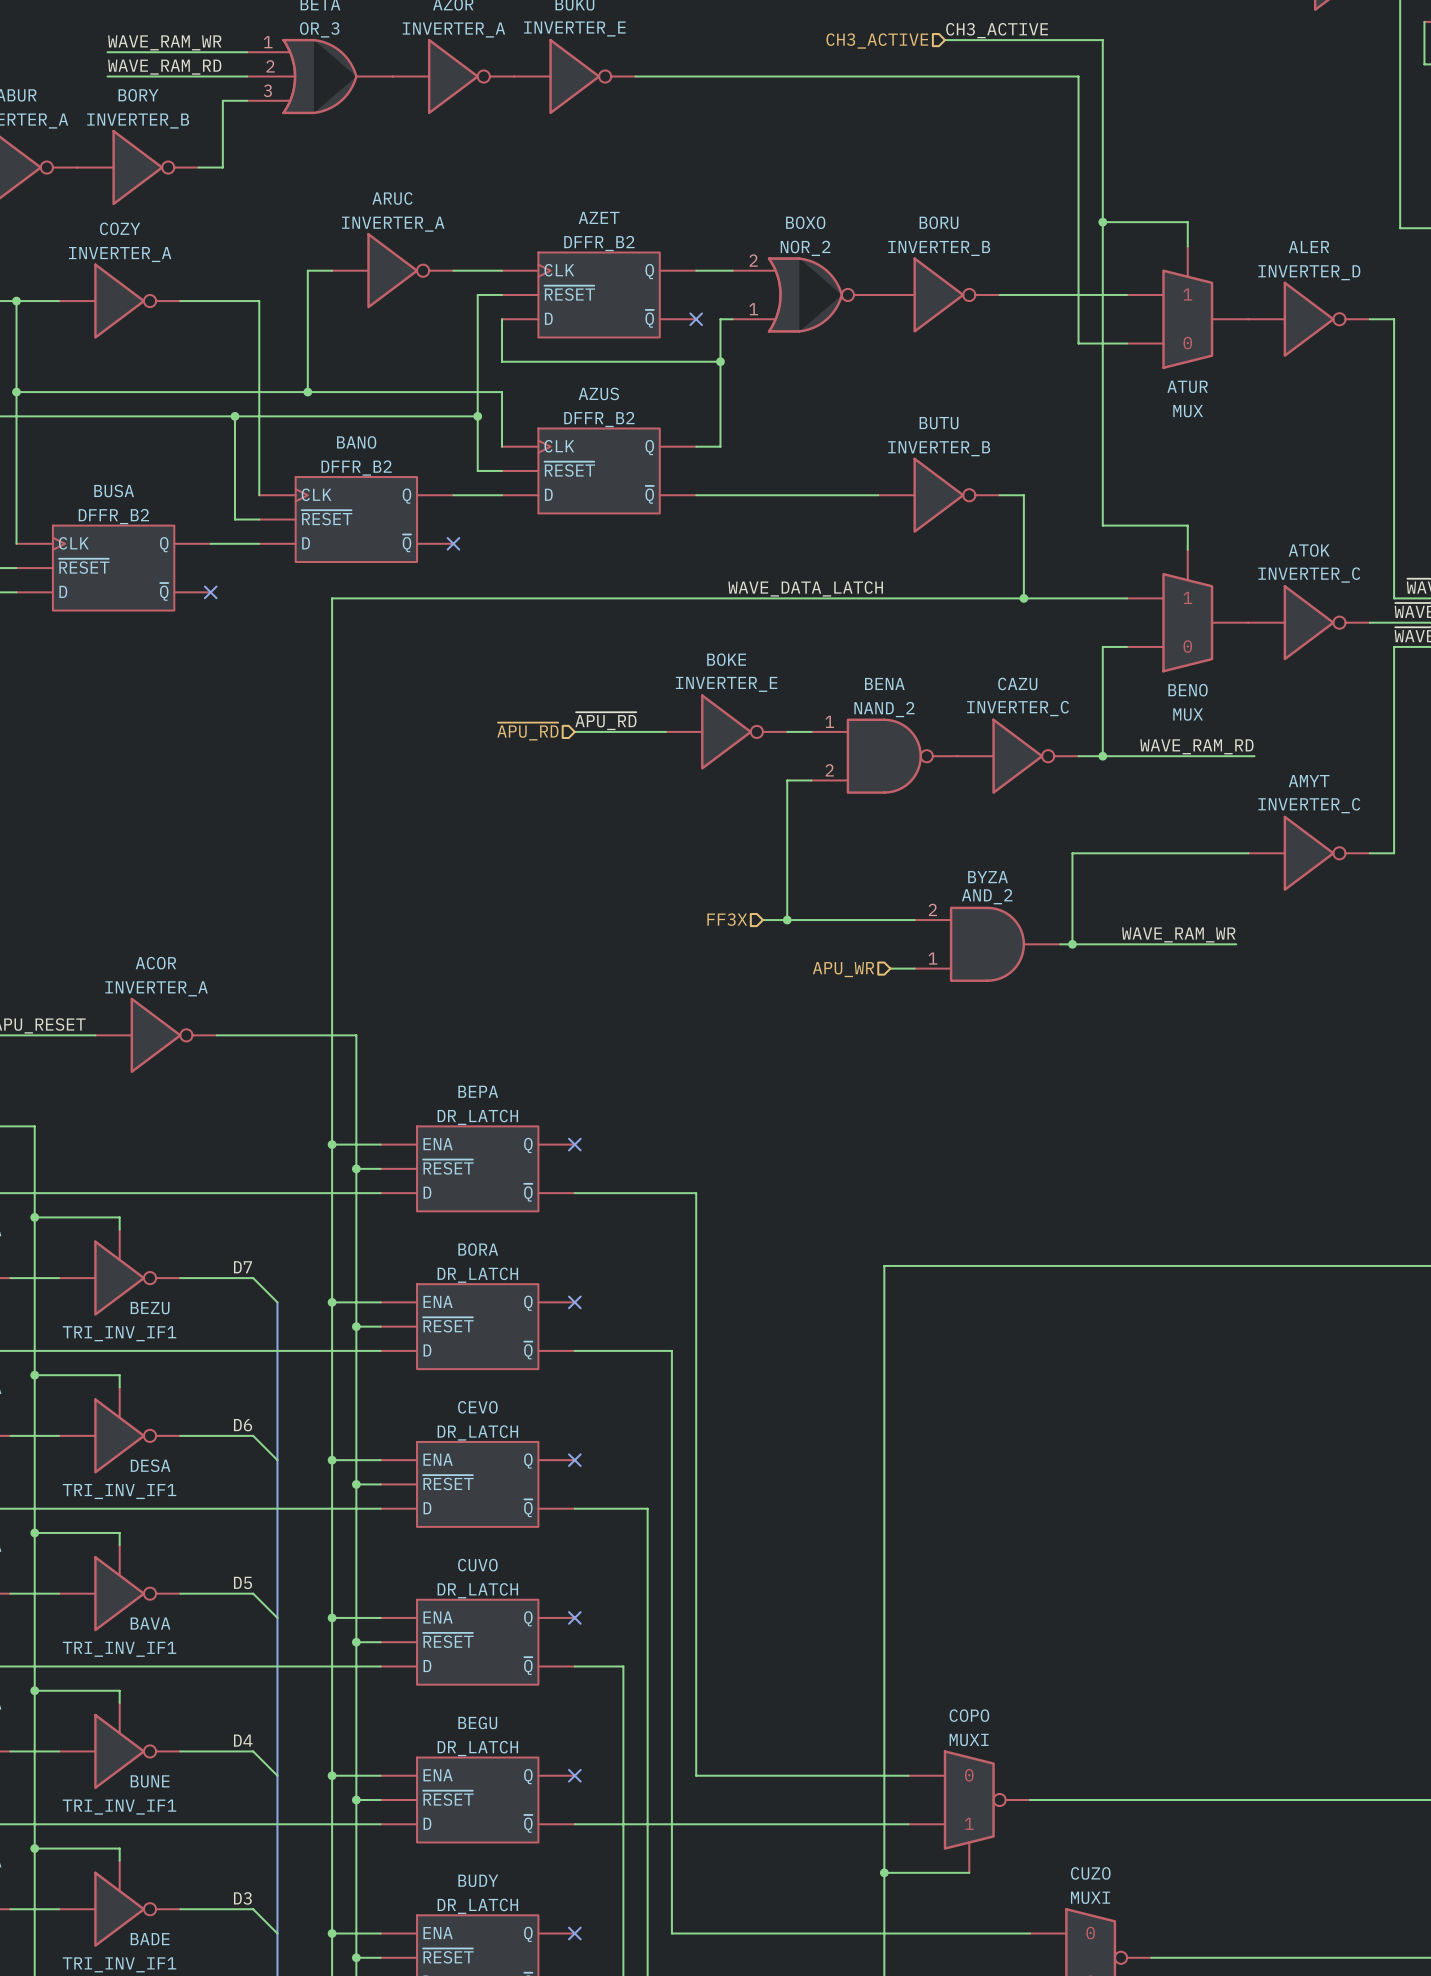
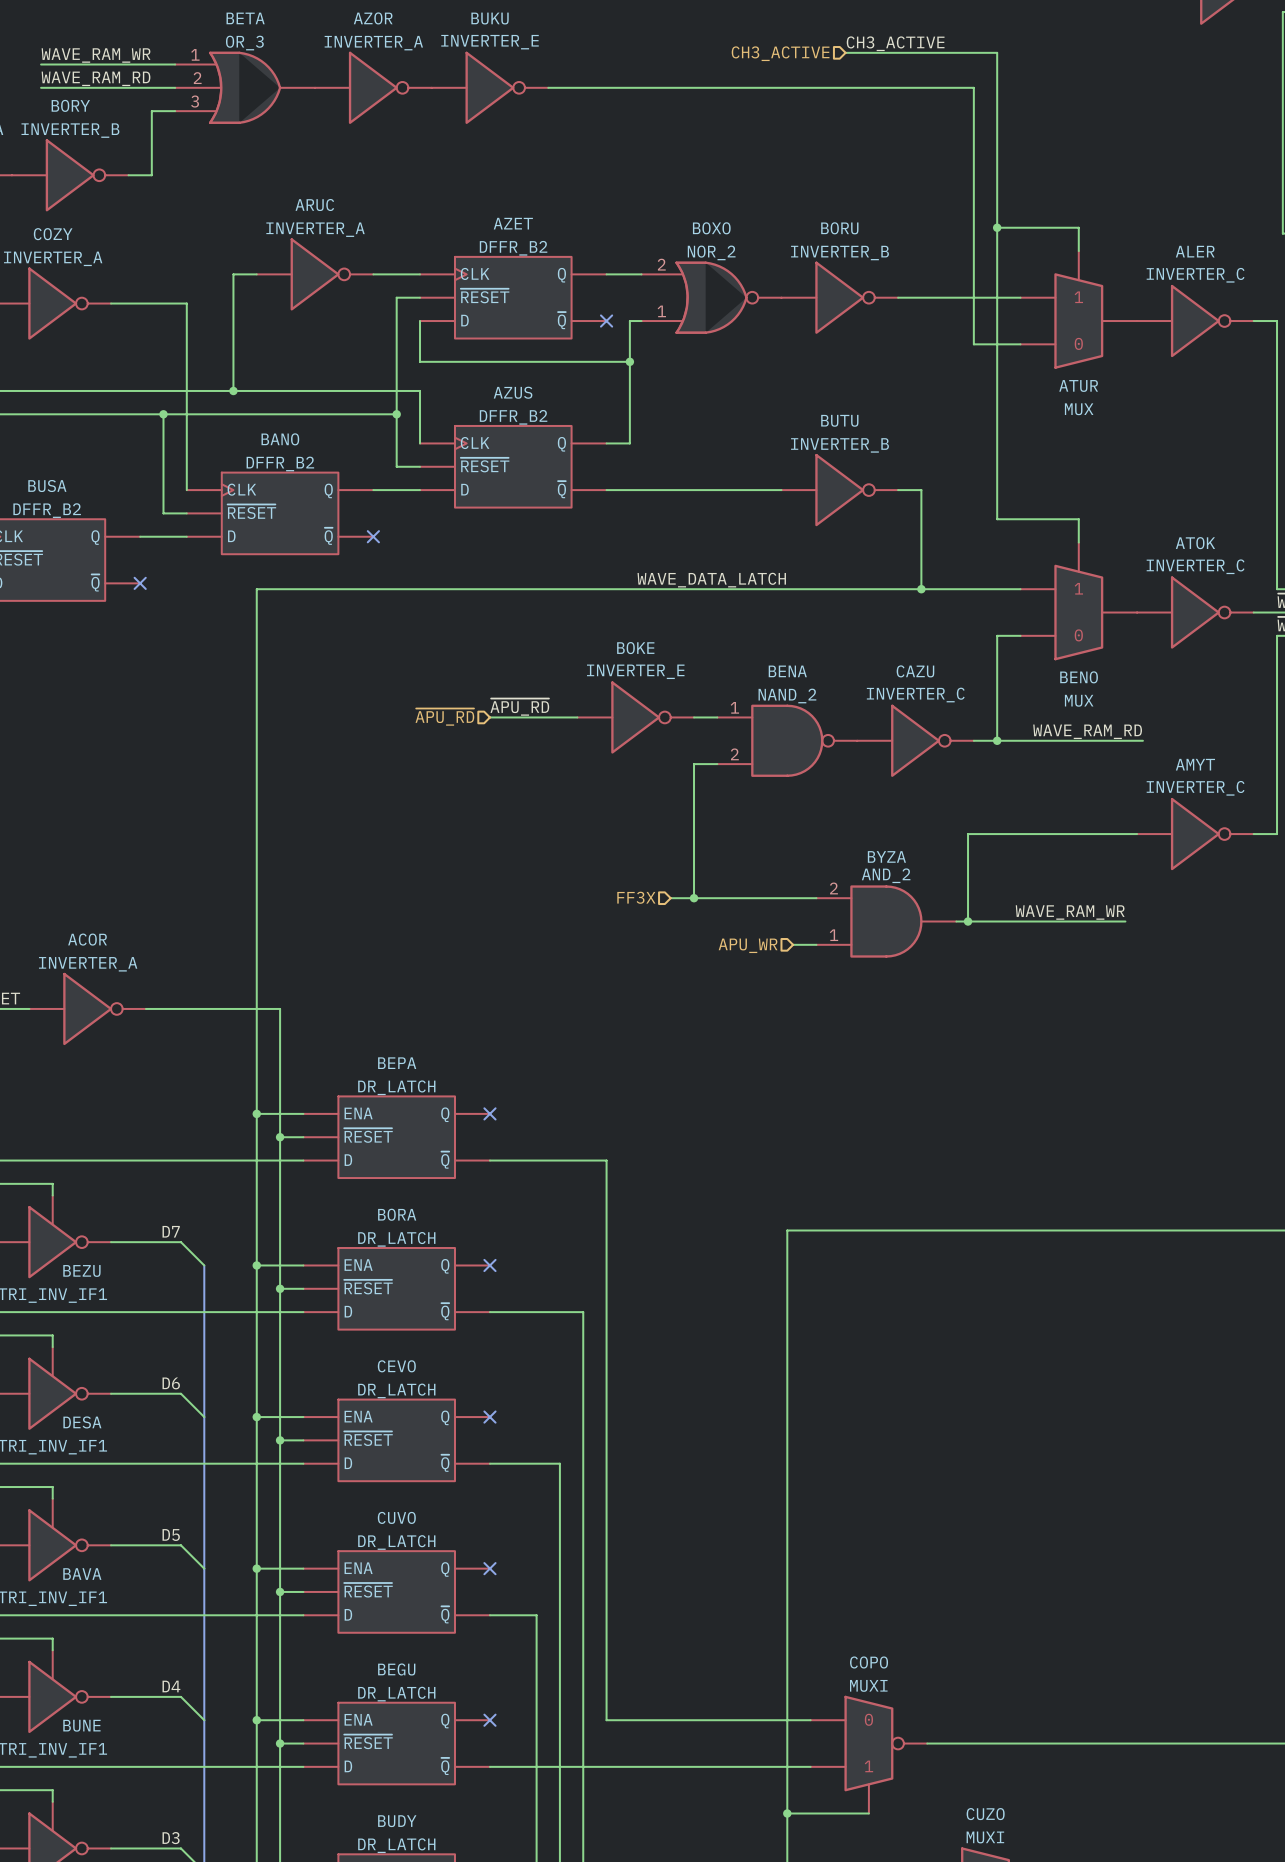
ALER value: INVERTER_D (1309, 272) -> INVERTER_C (1195, 275)

